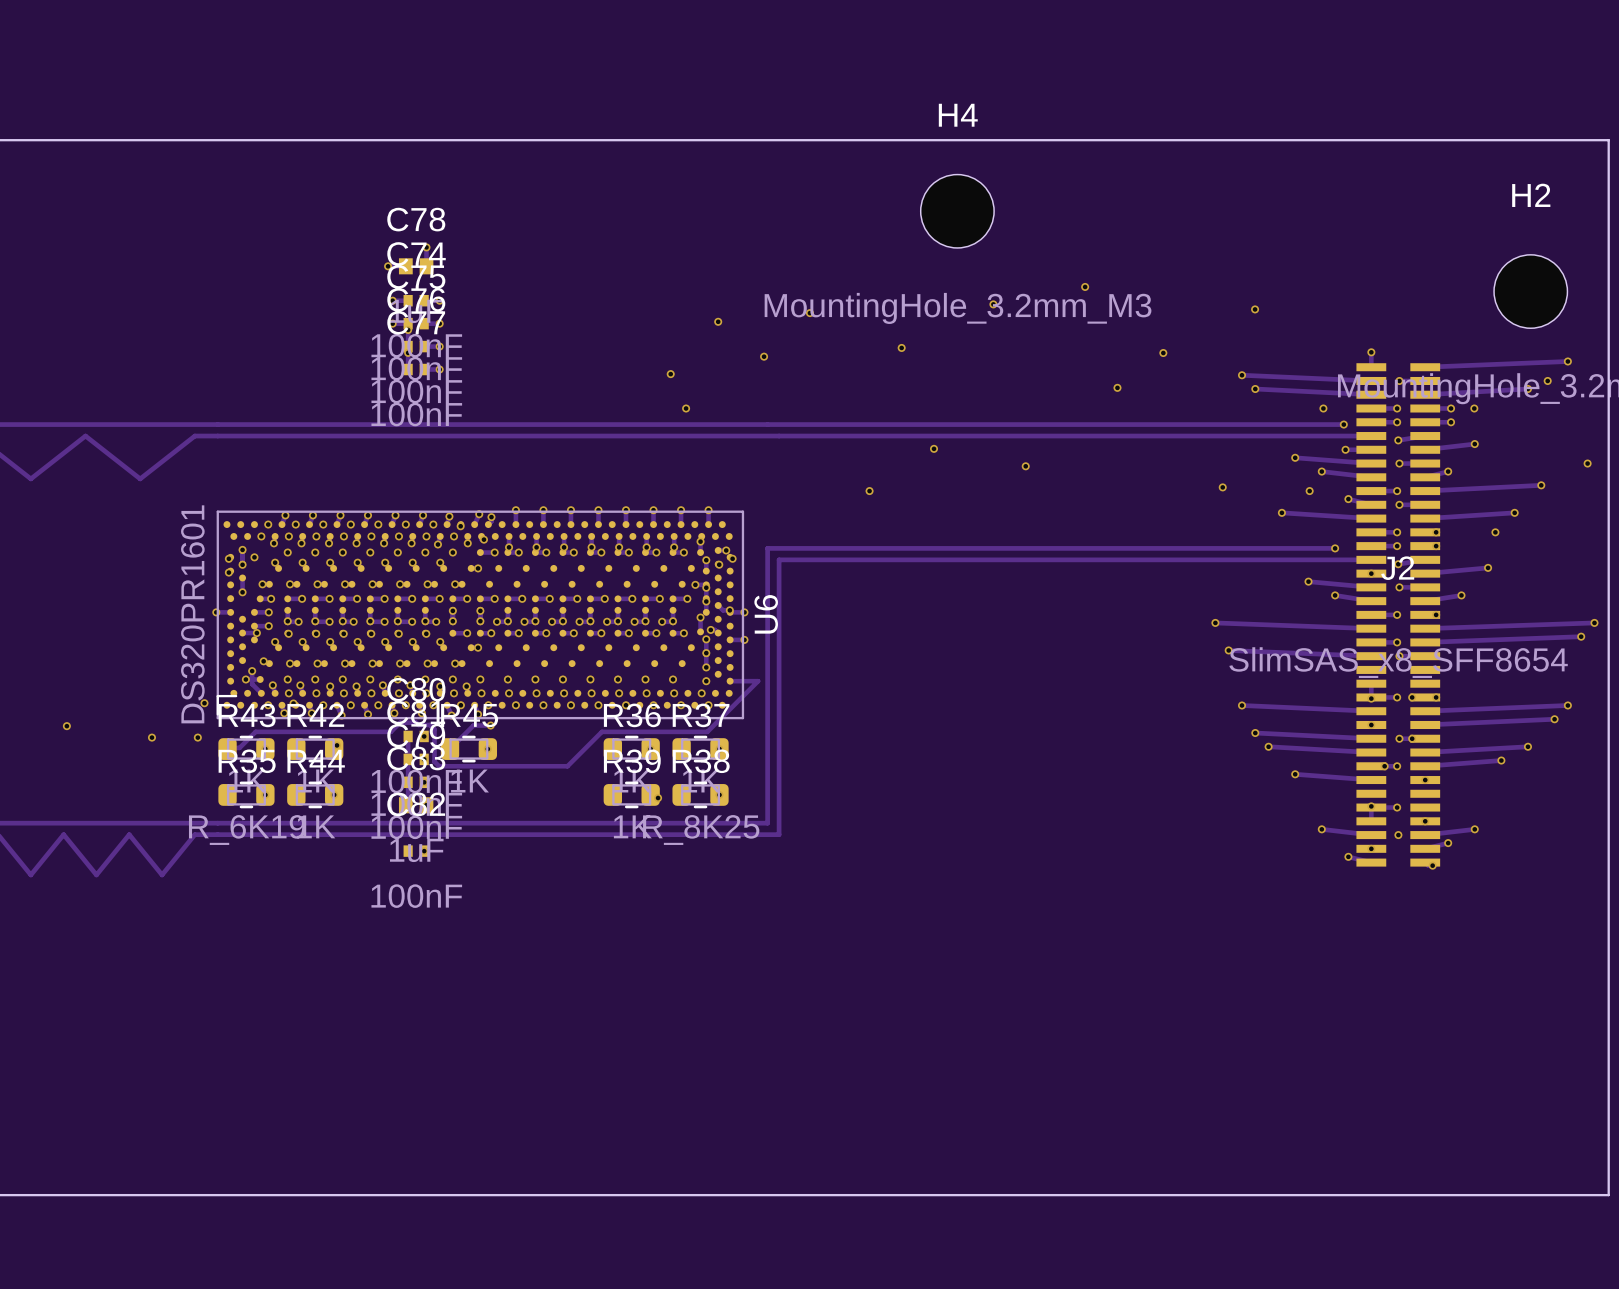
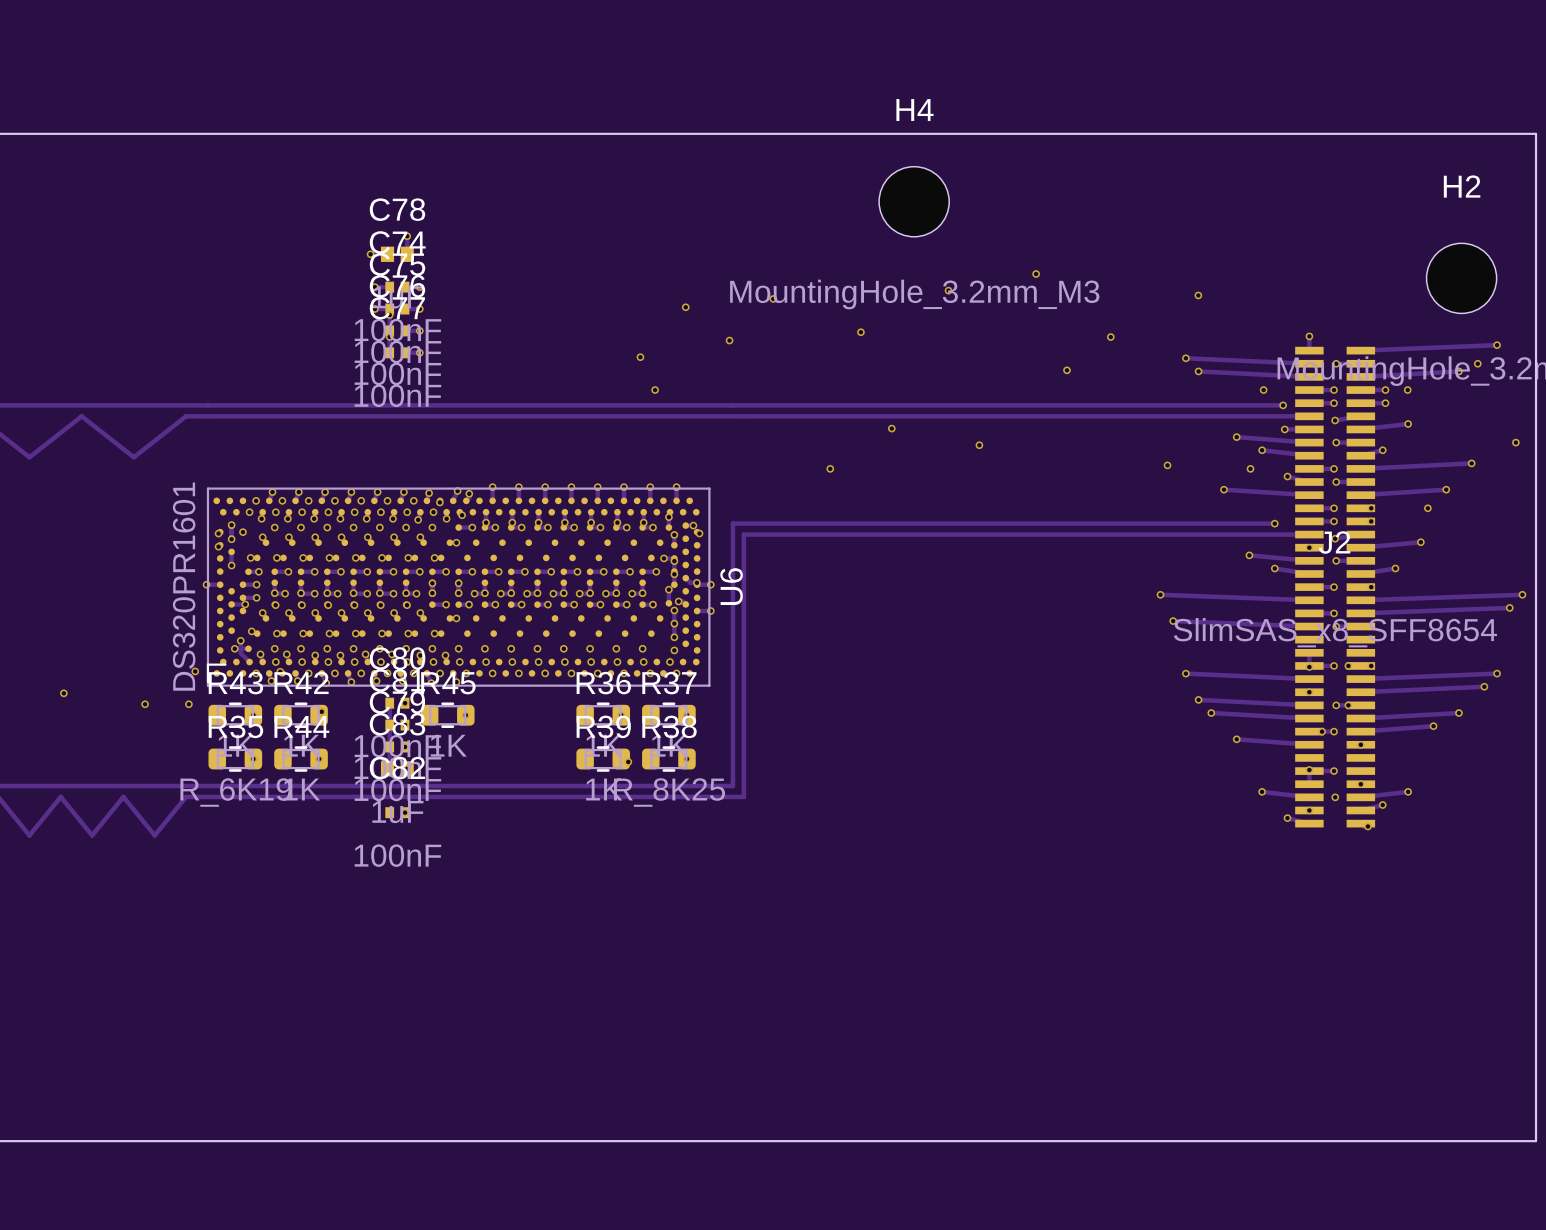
via: (719, 564) -> none
track: (730, 681) (758, 681) (707, 731) (601, 731) (567, 766) (439, 766) (434, 761) (434, 729) (429, 724) (418, 724) (416, 722) (400, 722) (390, 731) (255, 731) (239, 747) (228, 747) -> none
track: (490, 725) (473, 725) (449, 749) -> none
via: (490, 725) -> none

